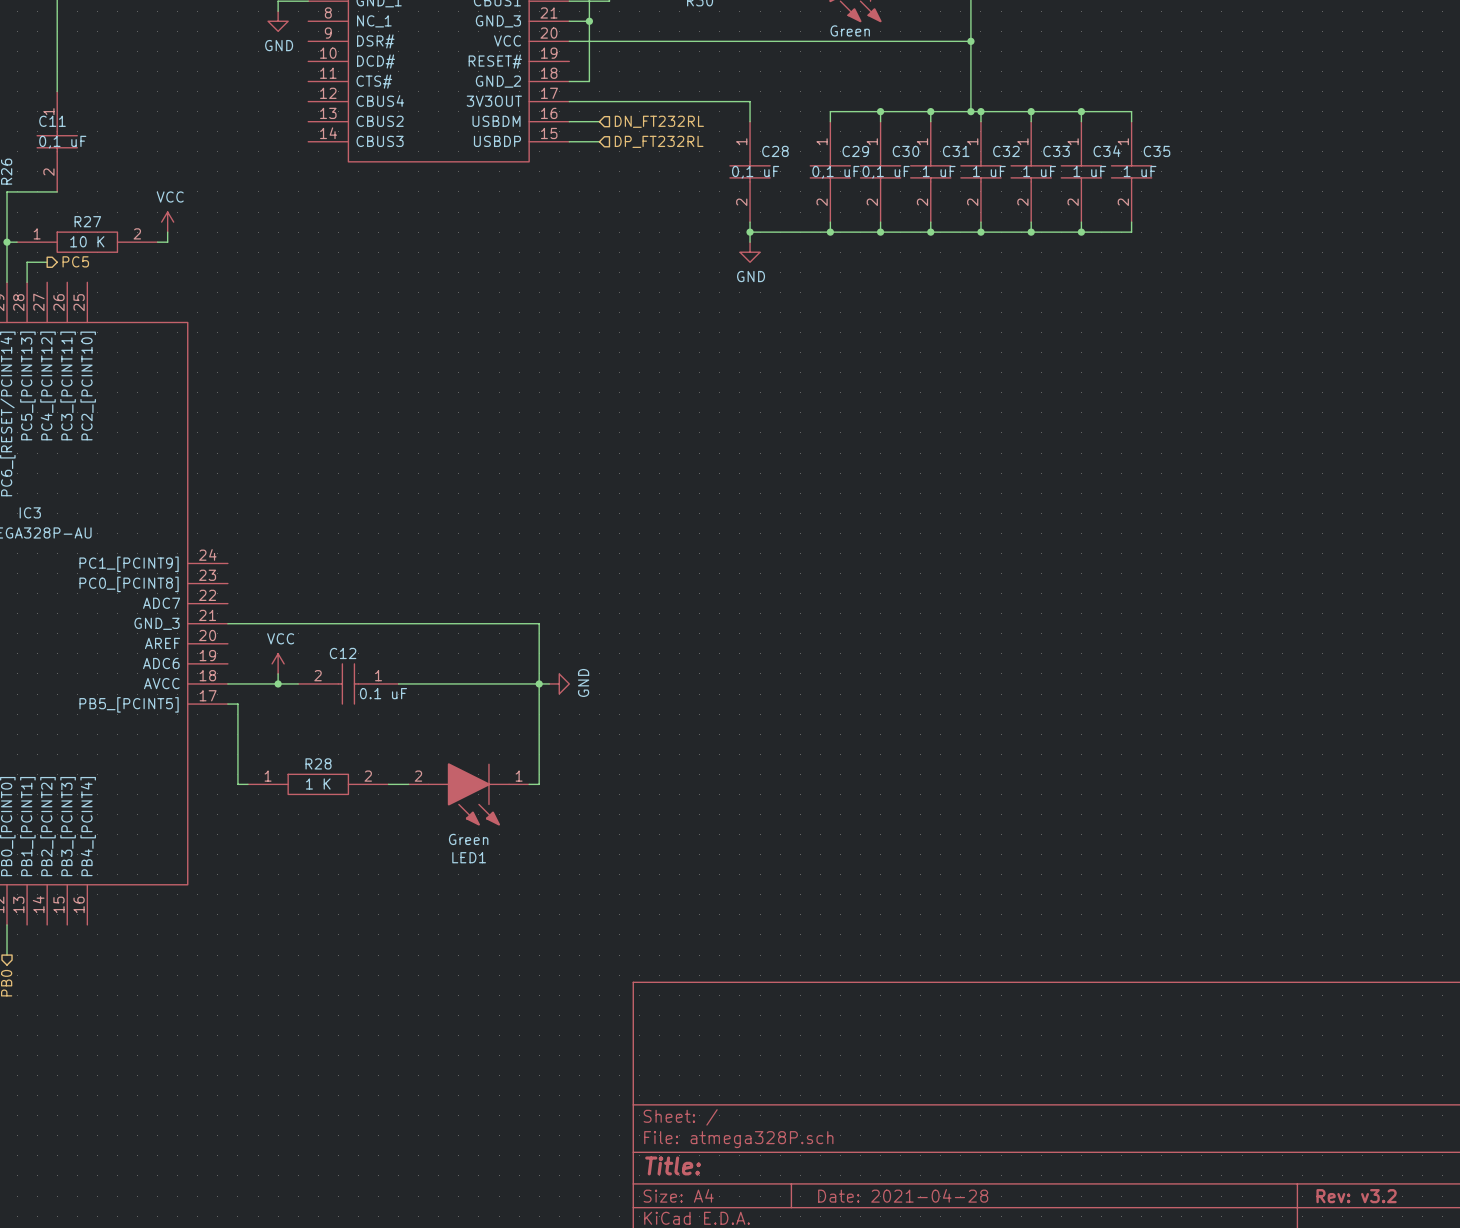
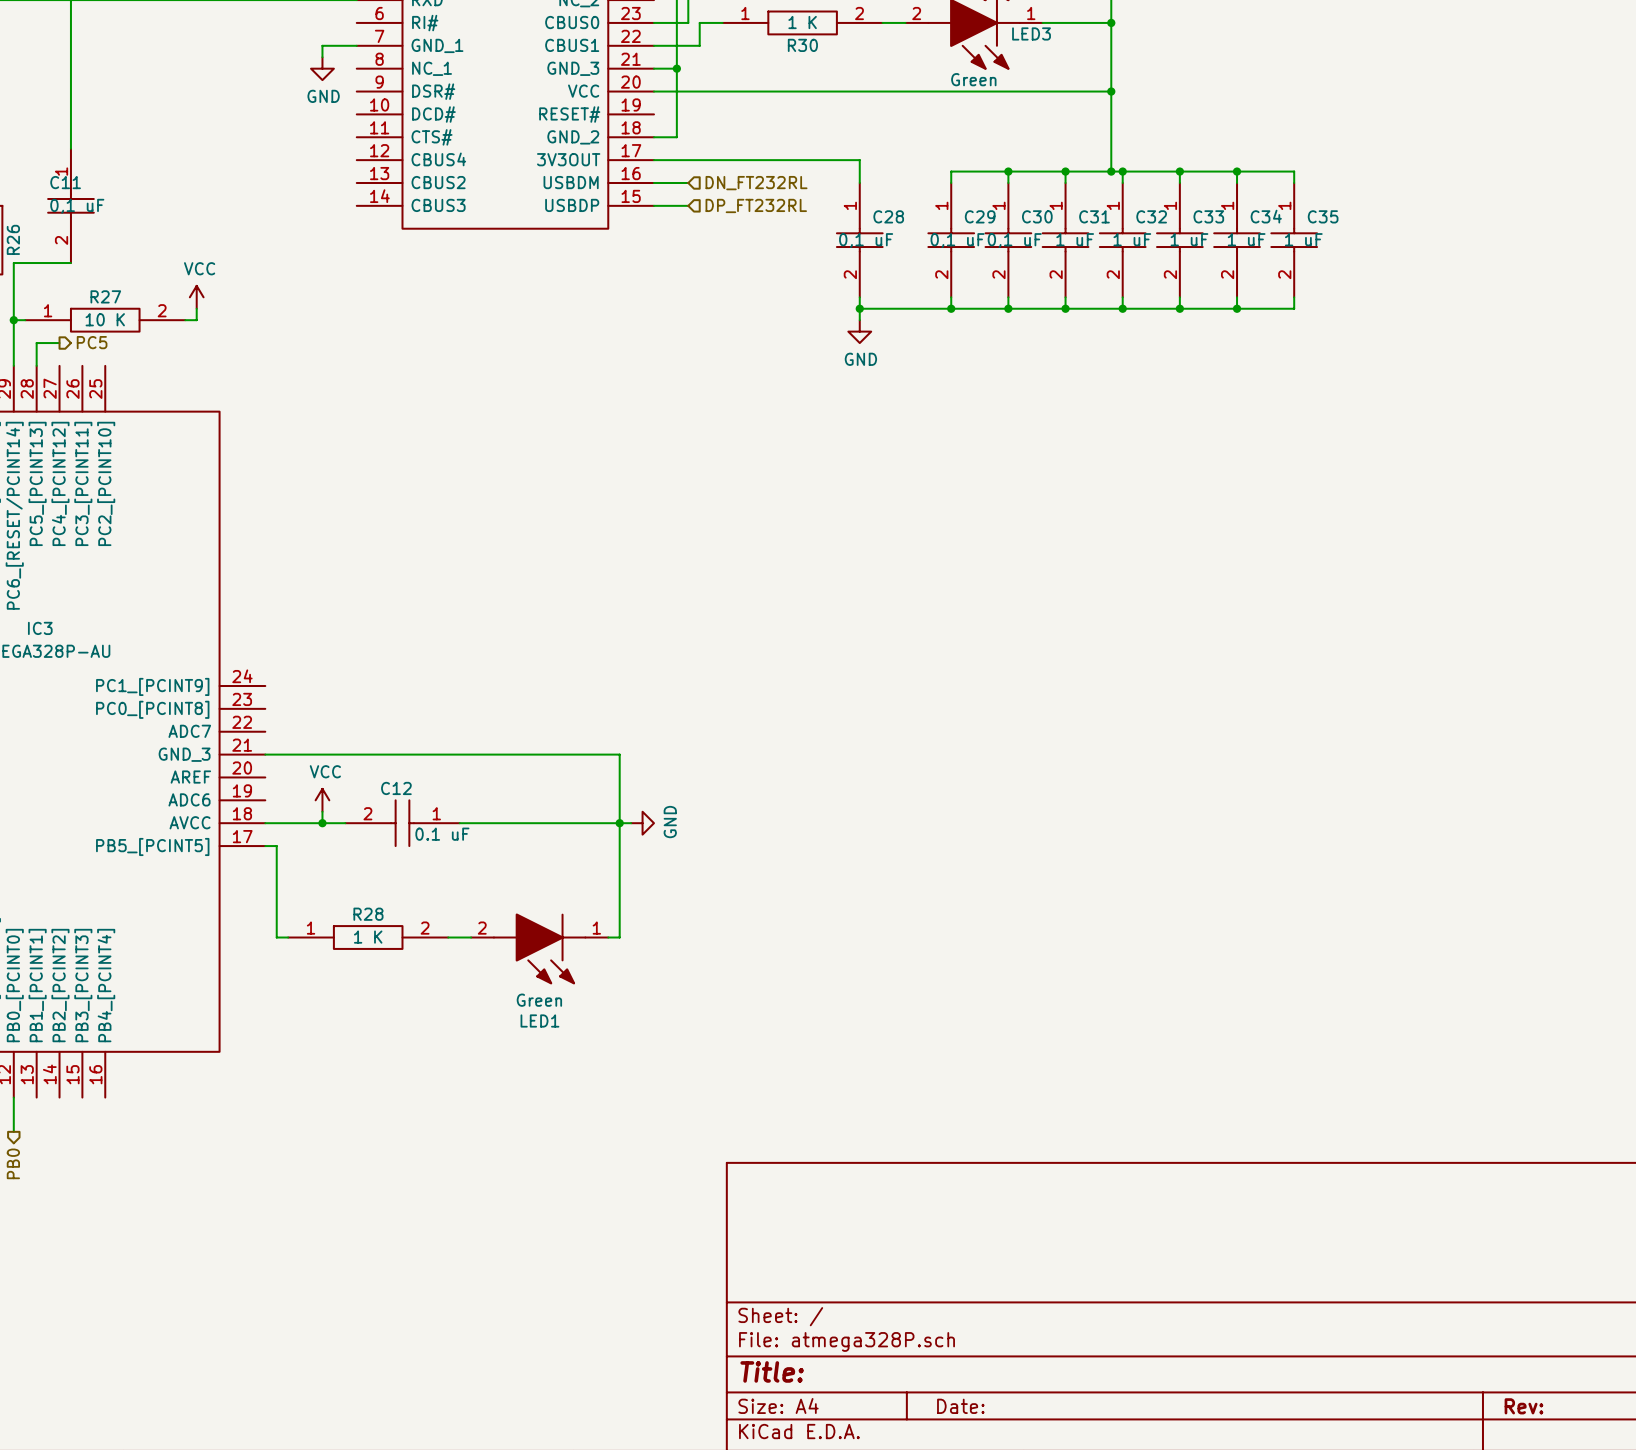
title block: Date: 2021-04-28 (903, 1195) -> Date: (960, 1406)
title block: Rev: v3.2 (1356, 1196) -> Rev: (1523, 1406)

